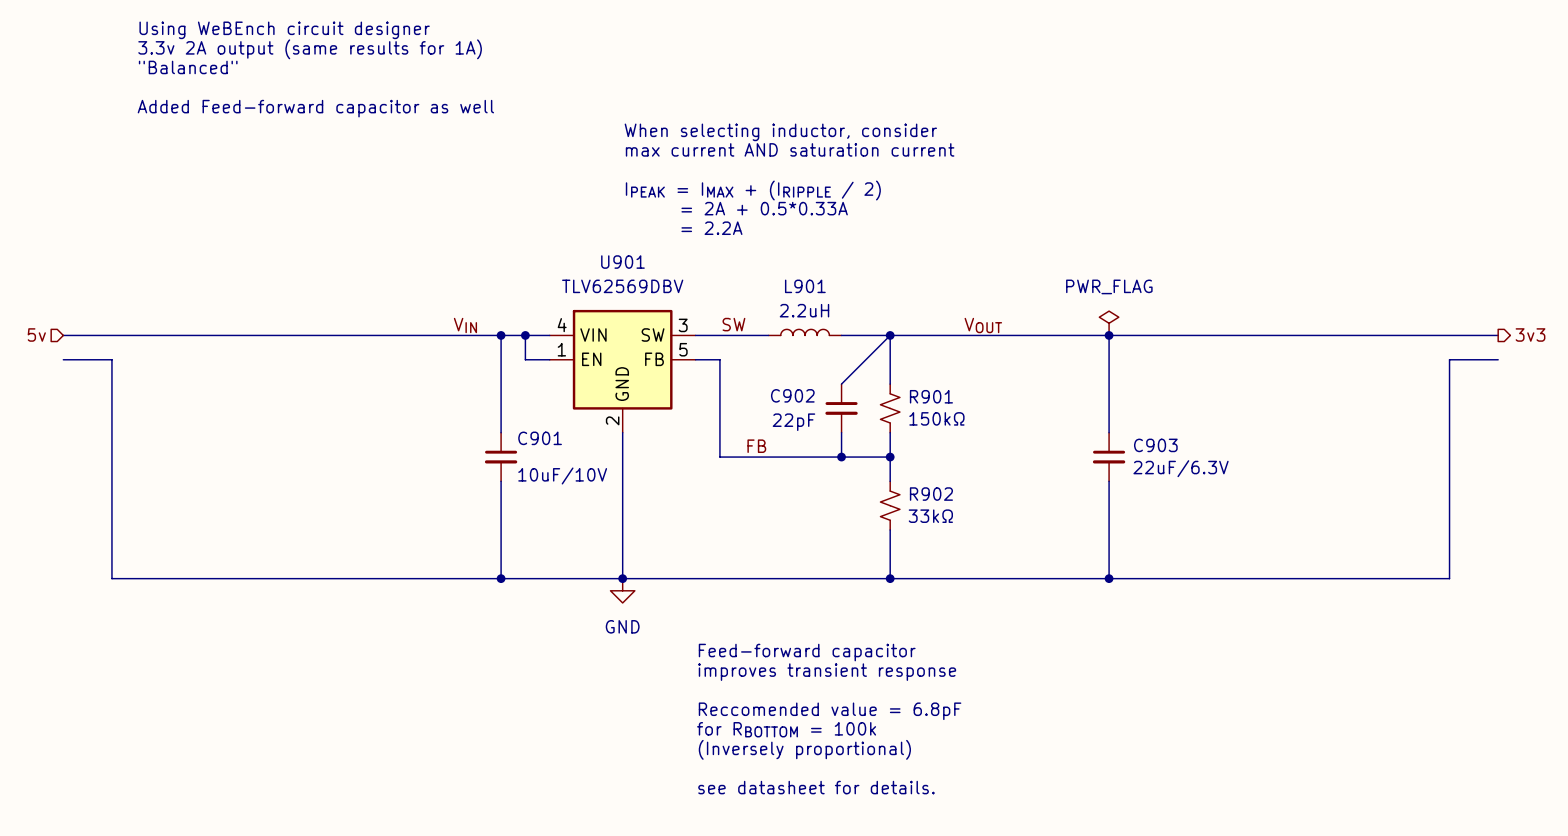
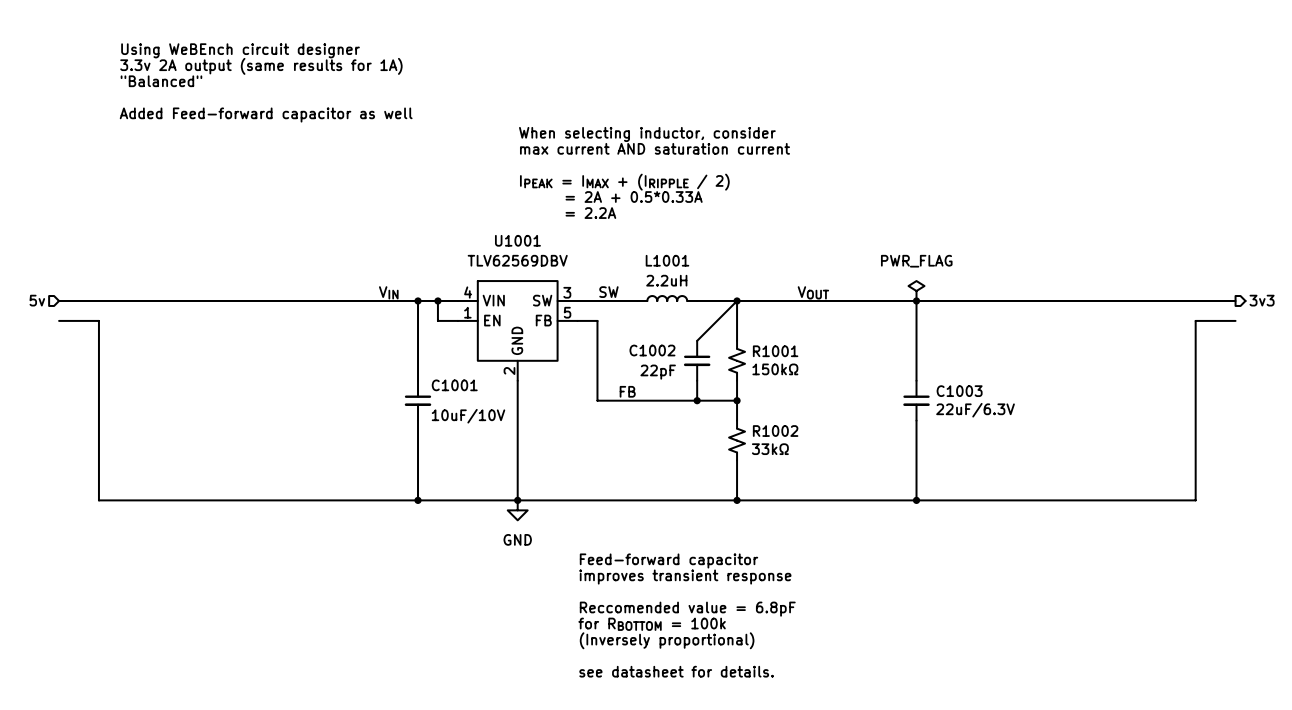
U901 name: U901 (622, 262) -> U1001 (517, 240)
L901 name: L901 (805, 286) -> L1001 (667, 260)
C902 name: C902 (792, 395) -> C1002 (652, 350)
R901 name: R901 (931, 396) -> R1001 (775, 351)
C901 name: C901 (540, 438) -> C1001 (454, 385)
C903 name: C903 (1155, 445) -> C1003 (959, 391)
R902 name: R902 (931, 494) -> R1002 (775, 431)

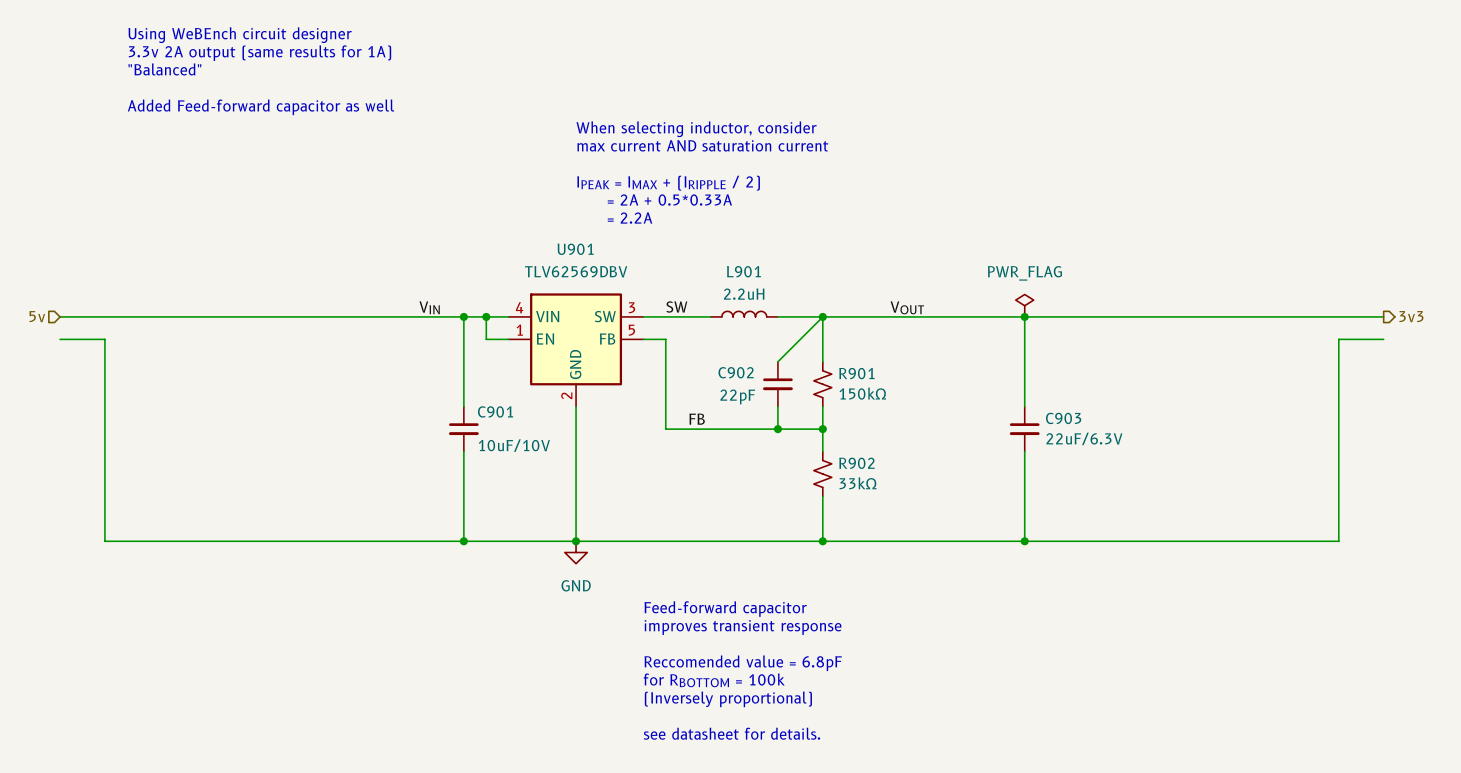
U1001 name: U1001 (517, 240) -> U901 (575, 249)
L1001 name: L1001 (667, 260) -> L901 (743, 271)
C1002 name: C1002 (652, 350) -> C902 (736, 372)
R1001 name: R1001 (775, 351) -> R901 (856, 373)
C1001 name: C1001 (454, 385) -> C901 (495, 411)
C1003 name: C1003 (959, 391) -> C903 (1063, 418)
R1002 name: R1002 (775, 431) -> R902 (856, 463)

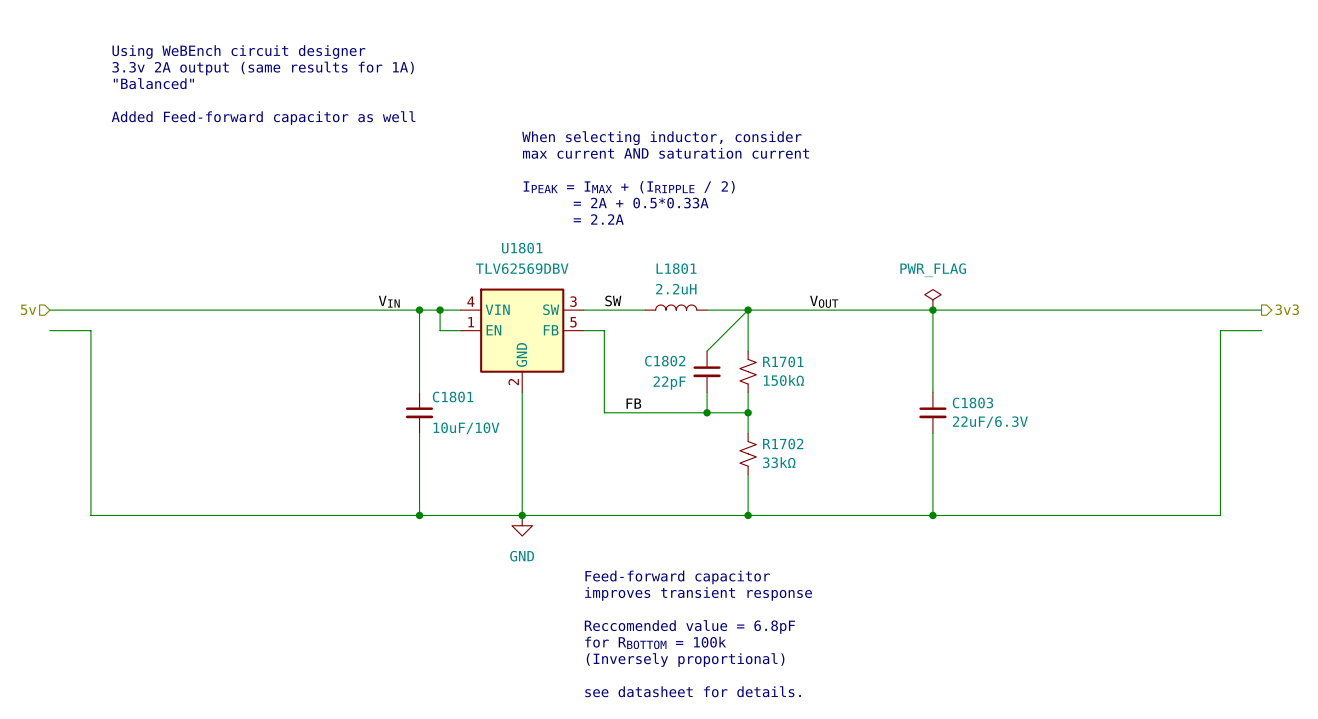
U901 name: U901 (575, 249) -> U1801 (522, 248)
L901 name: L901 (743, 271) -> L1801 (676, 268)
C902 name: C902 (736, 372) -> C1802 (665, 361)
R901 name: R901 (856, 373) -> R1701 (783, 361)
C901 name: C901 (495, 411) -> C1801 (453, 397)
C903 name: C903 (1063, 418) -> C1803 (972, 402)
R902 name: R902 (856, 463) -> R1702 (783, 444)

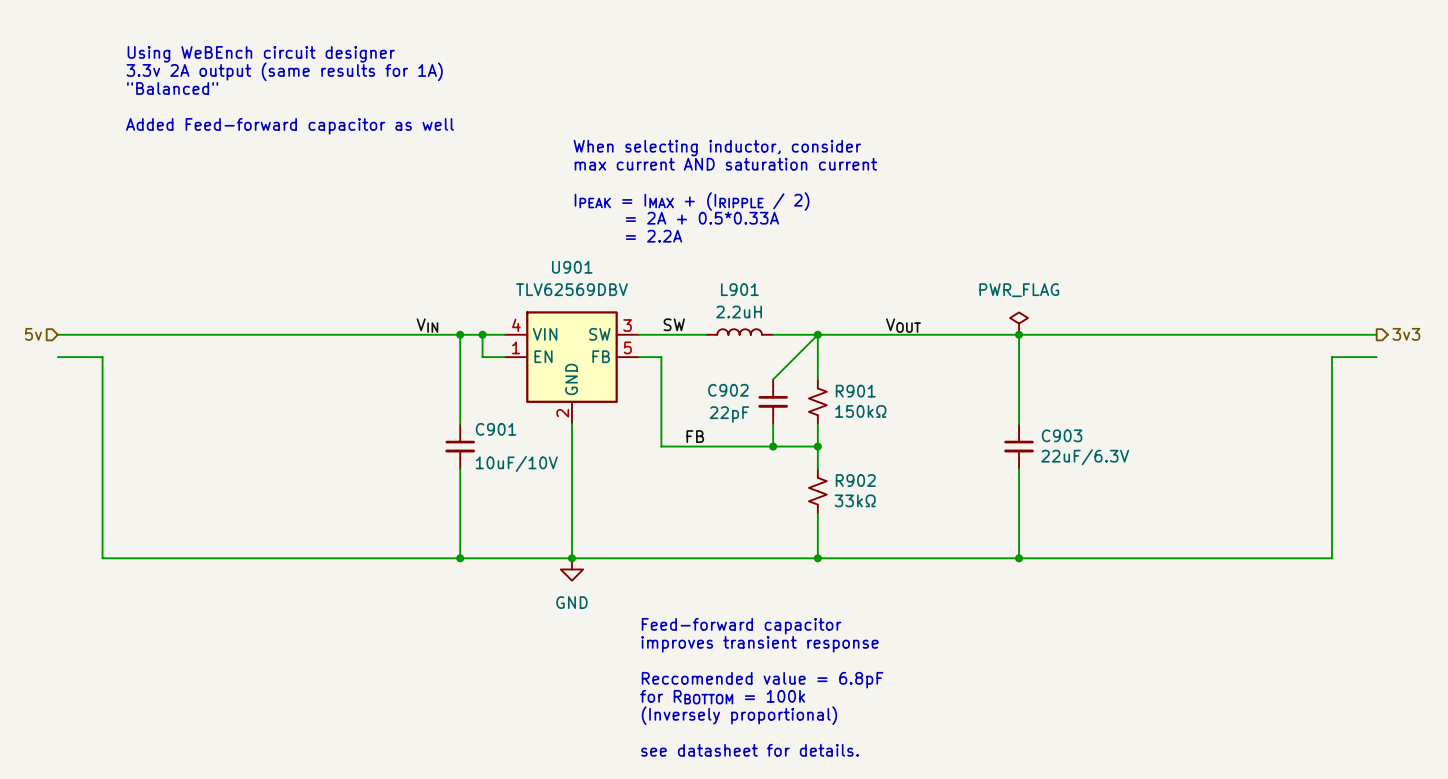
U1801 name: U1801 (522, 248) -> U901 (572, 267)
L1801 name: L1801 (676, 268) -> L901 (739, 289)
C1802 name: C1802 (665, 361) -> C902 (728, 390)
R1701 name: R1701 (783, 361) -> R901 (855, 391)
C1801 name: C1801 (453, 397) -> C901 (496, 429)
C1803 name: C1803 (972, 402) -> C903 (1062, 435)
R1702 name: R1702 (783, 444) -> R902 (855, 480)

